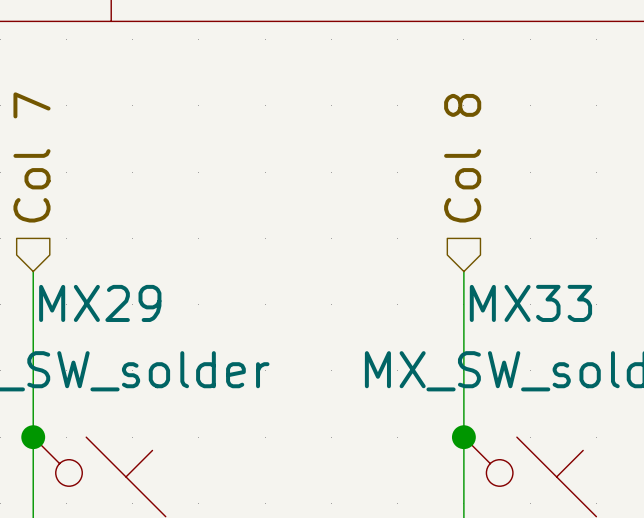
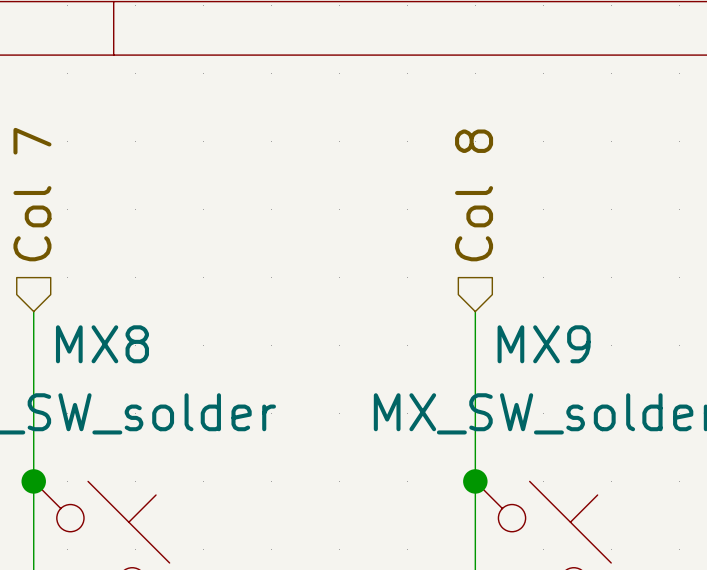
MX29 name: MX29 (100, 303) -> MX8 (102, 344)
MX33 name: MX33 (530, 303) -> MX9 (544, 344)

